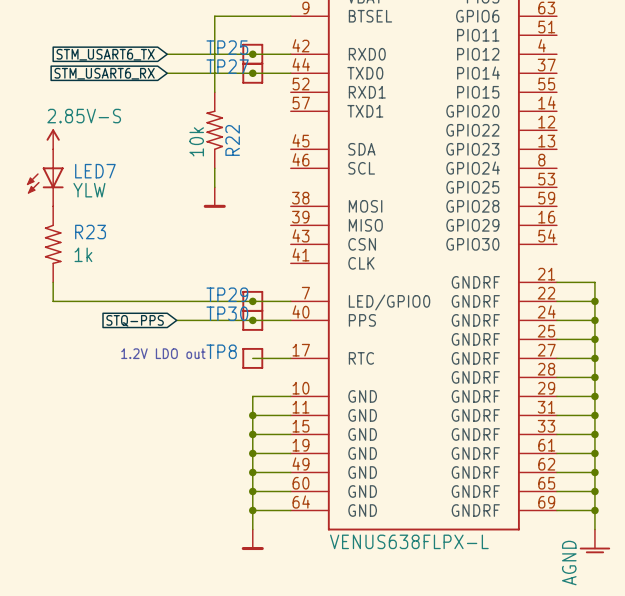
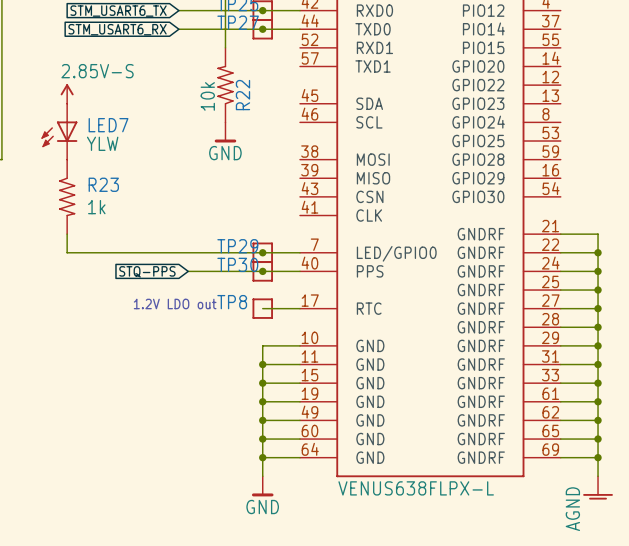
power symbol: none -> GND (225, 132)
power symbol: (214, 197) -> none
power symbol text: none -> GND (262, 507)

